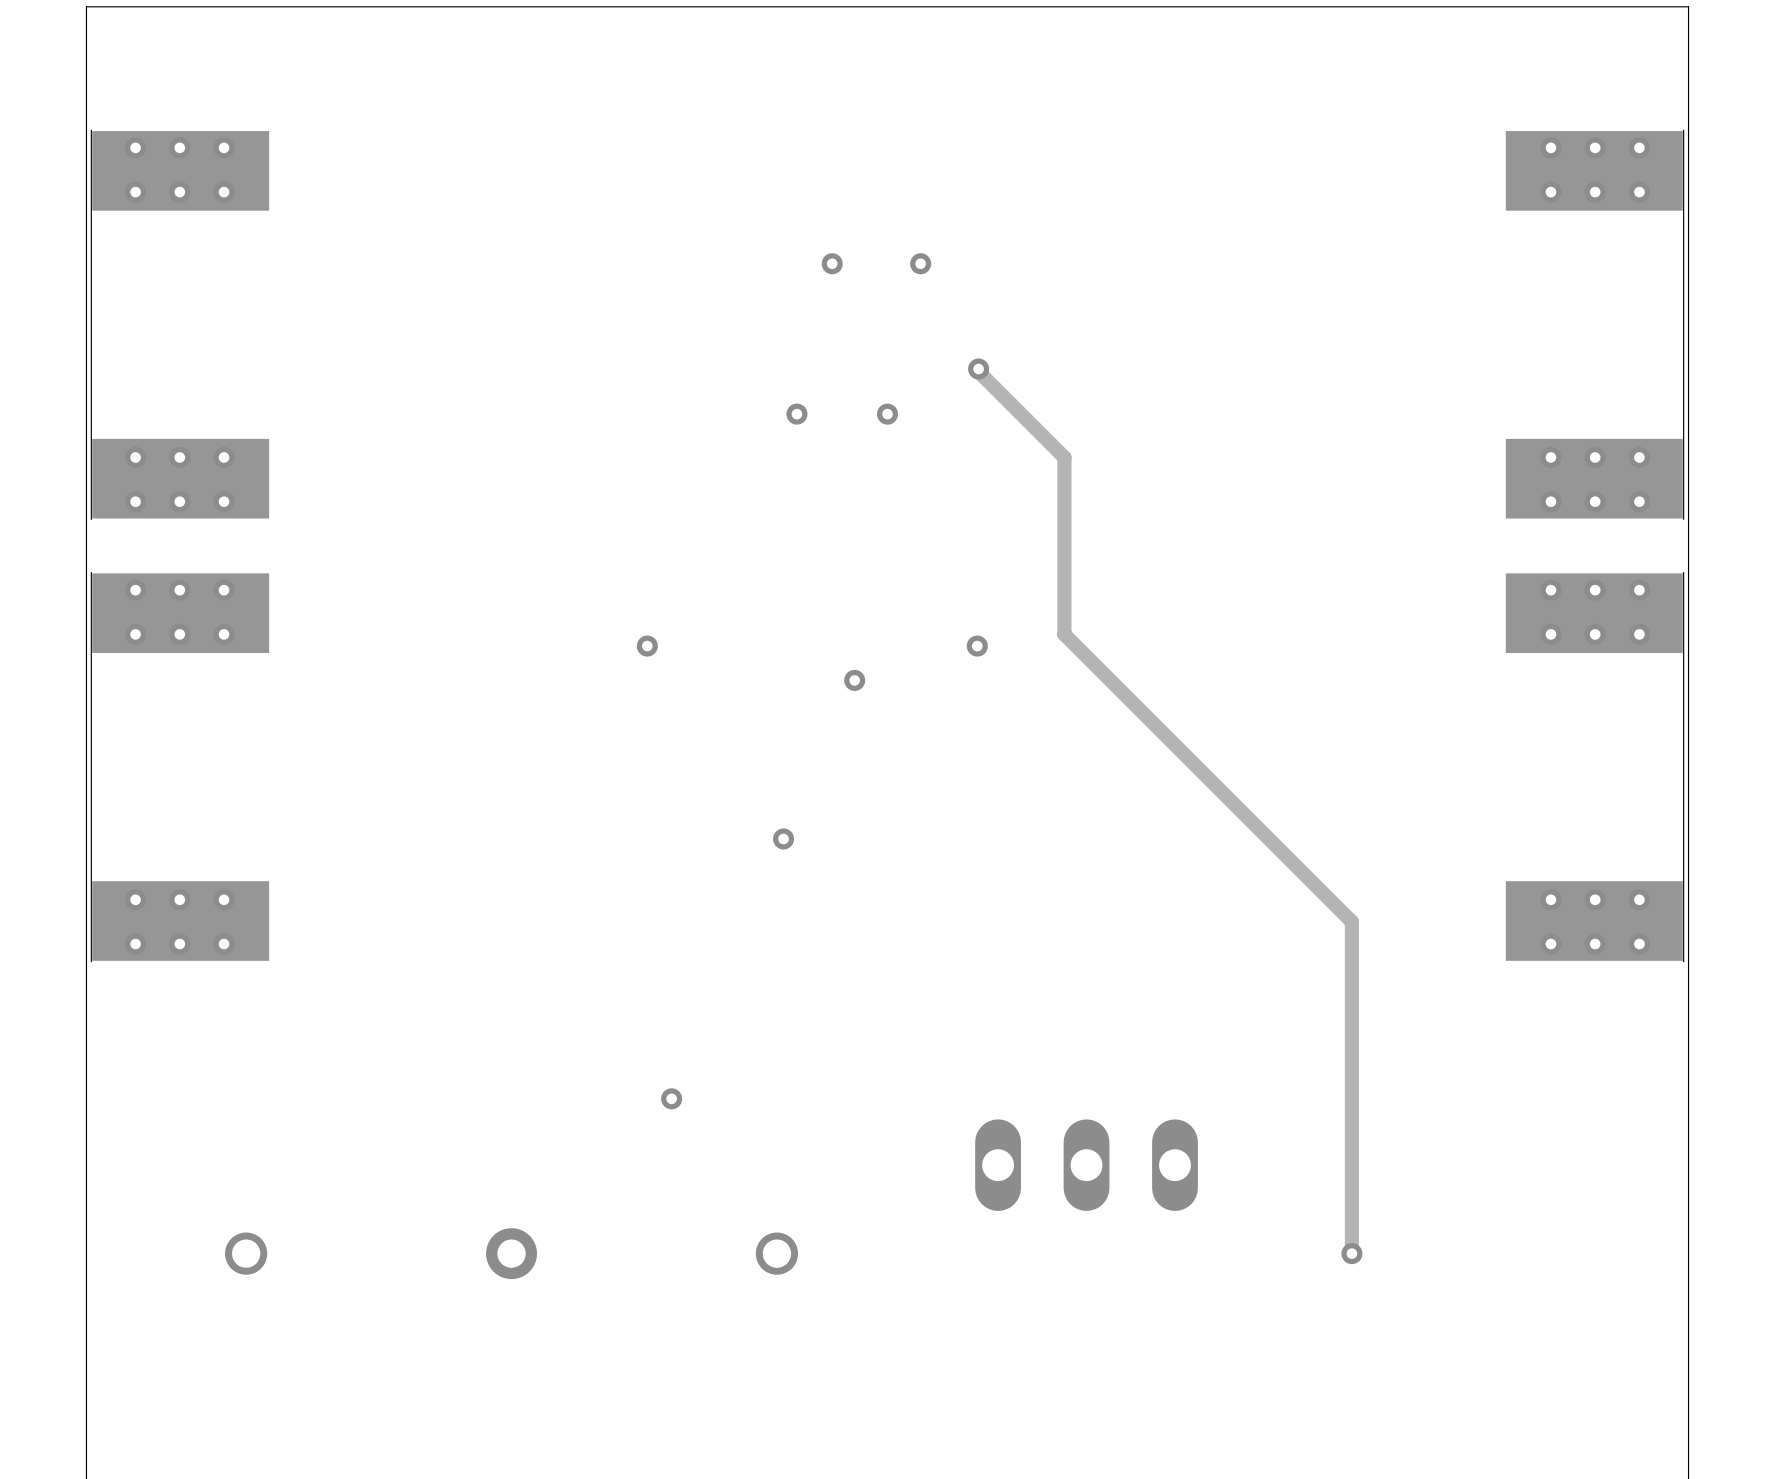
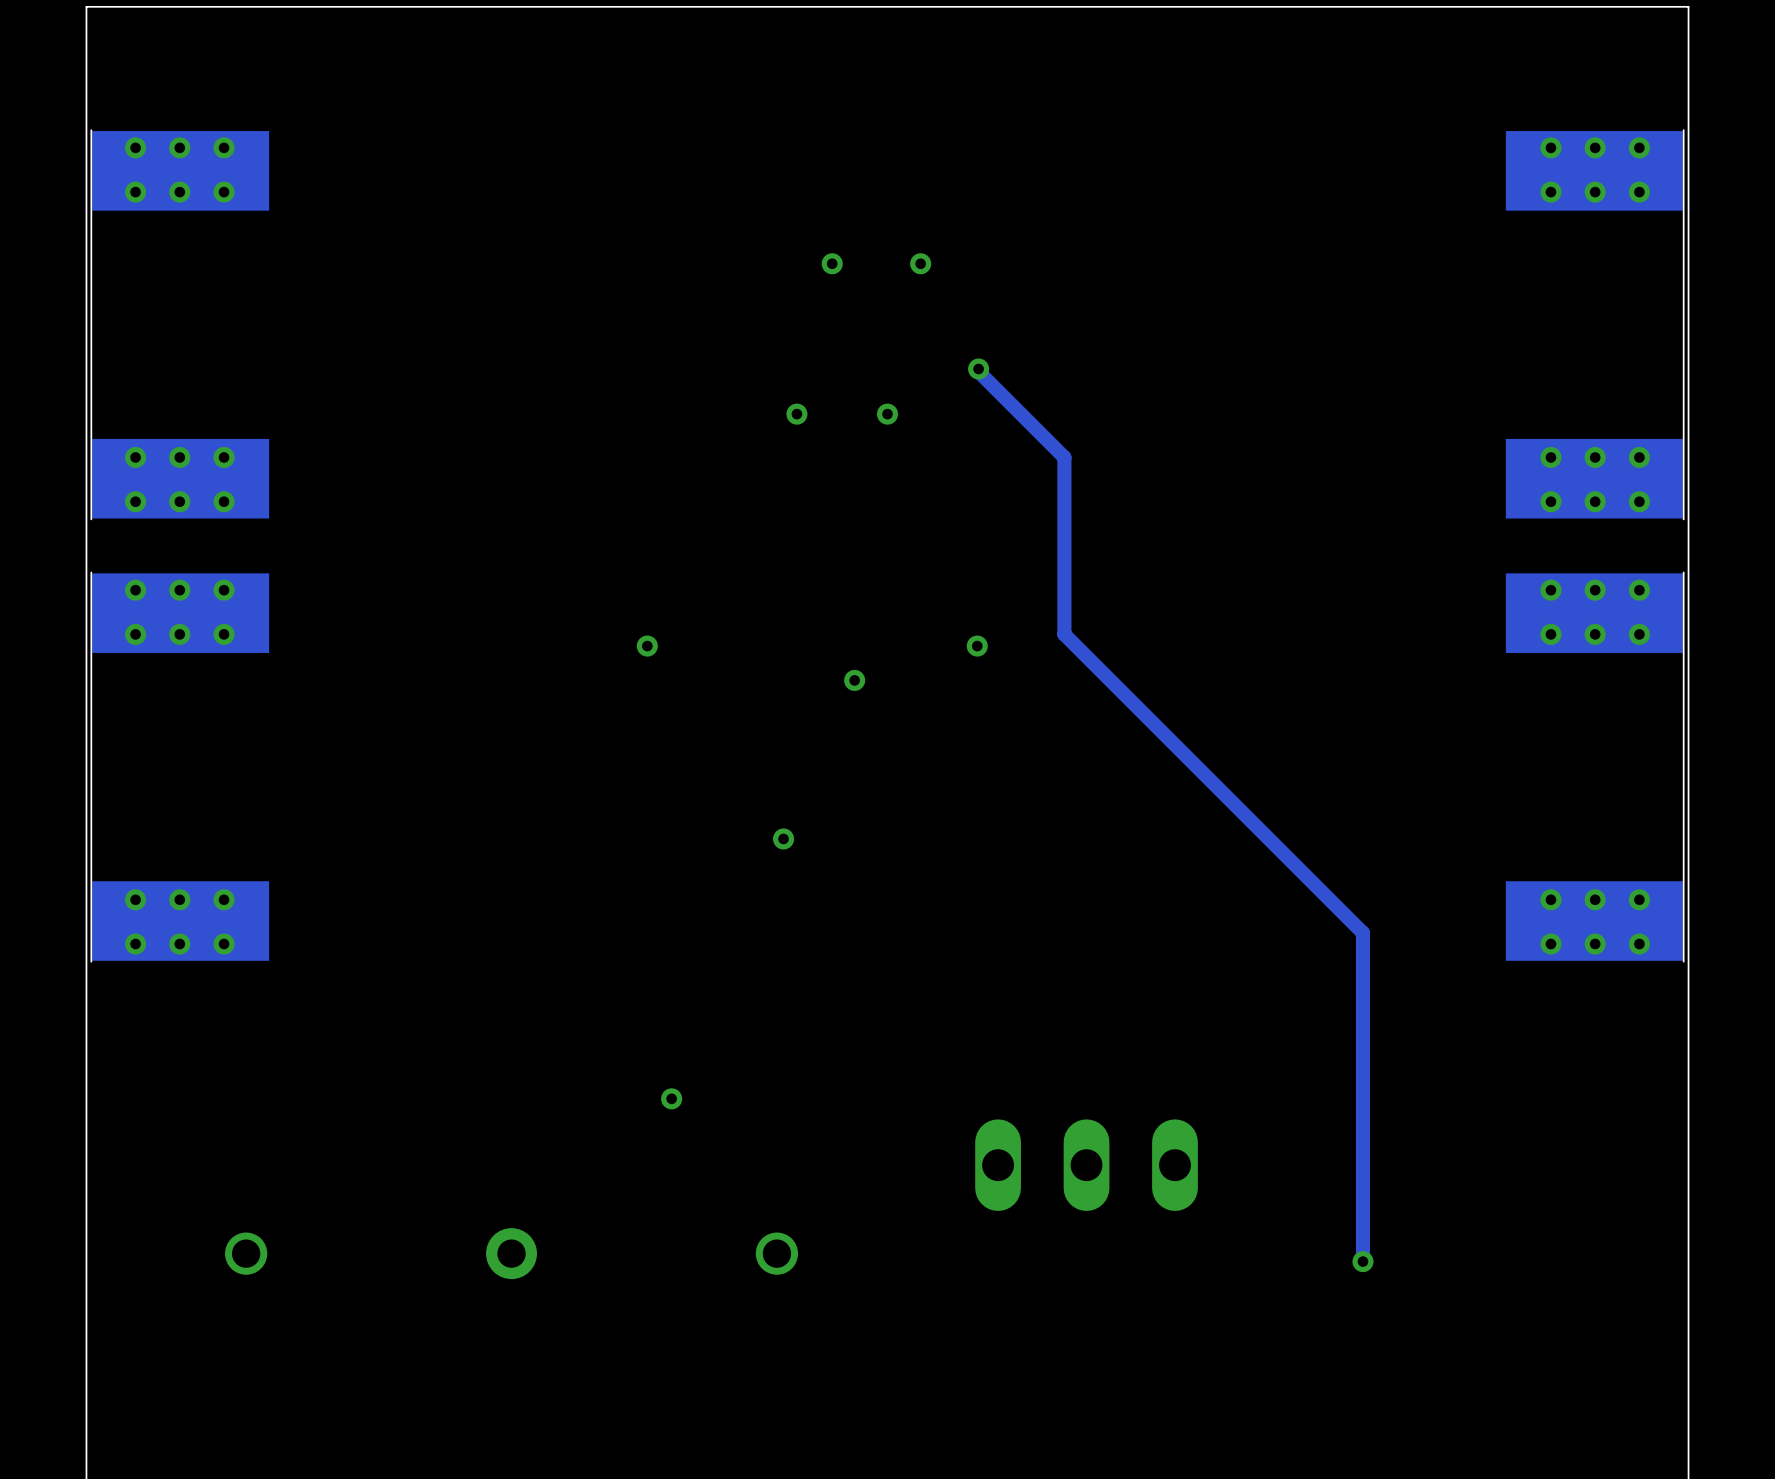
track: (1351, 921) (1351, 1253) -> (1351, 921) (1362, 932) (1362, 1261)
via position: (1351, 1253) -> (1362, 1261)

